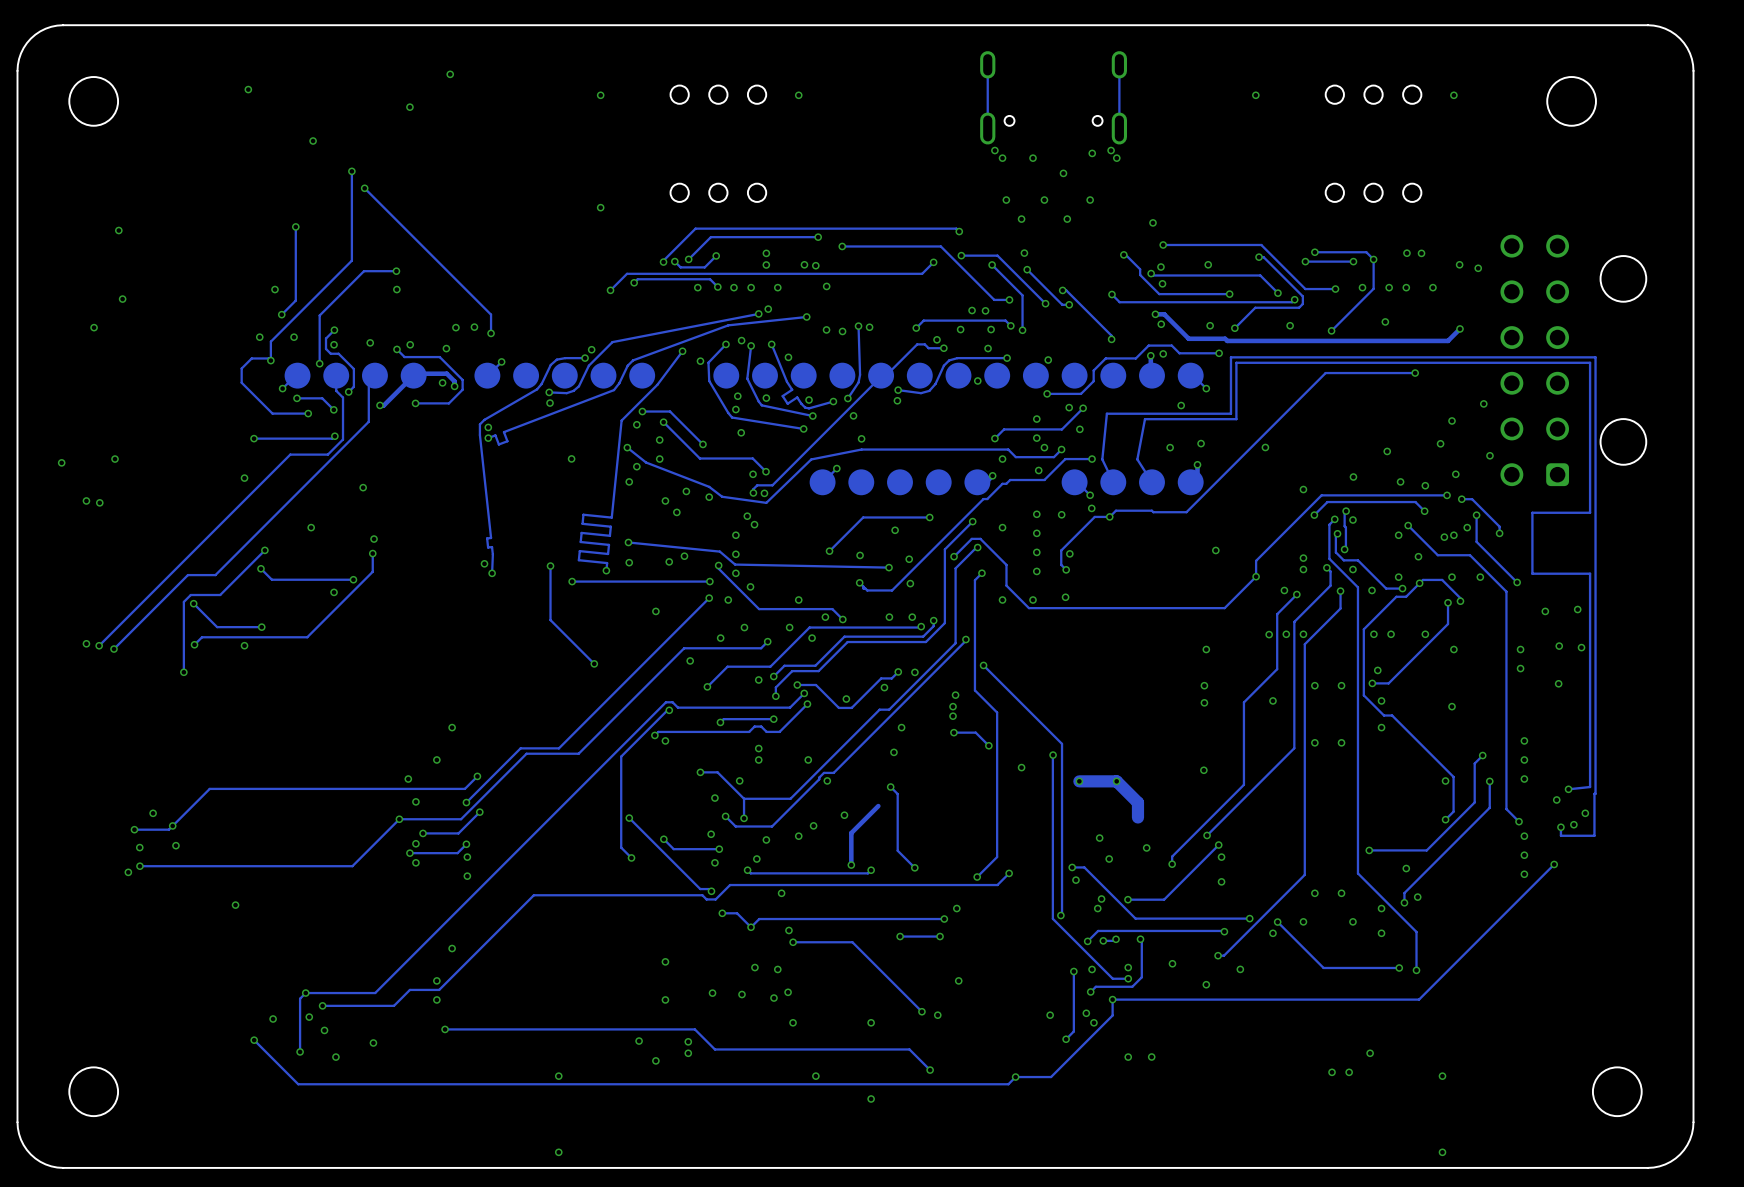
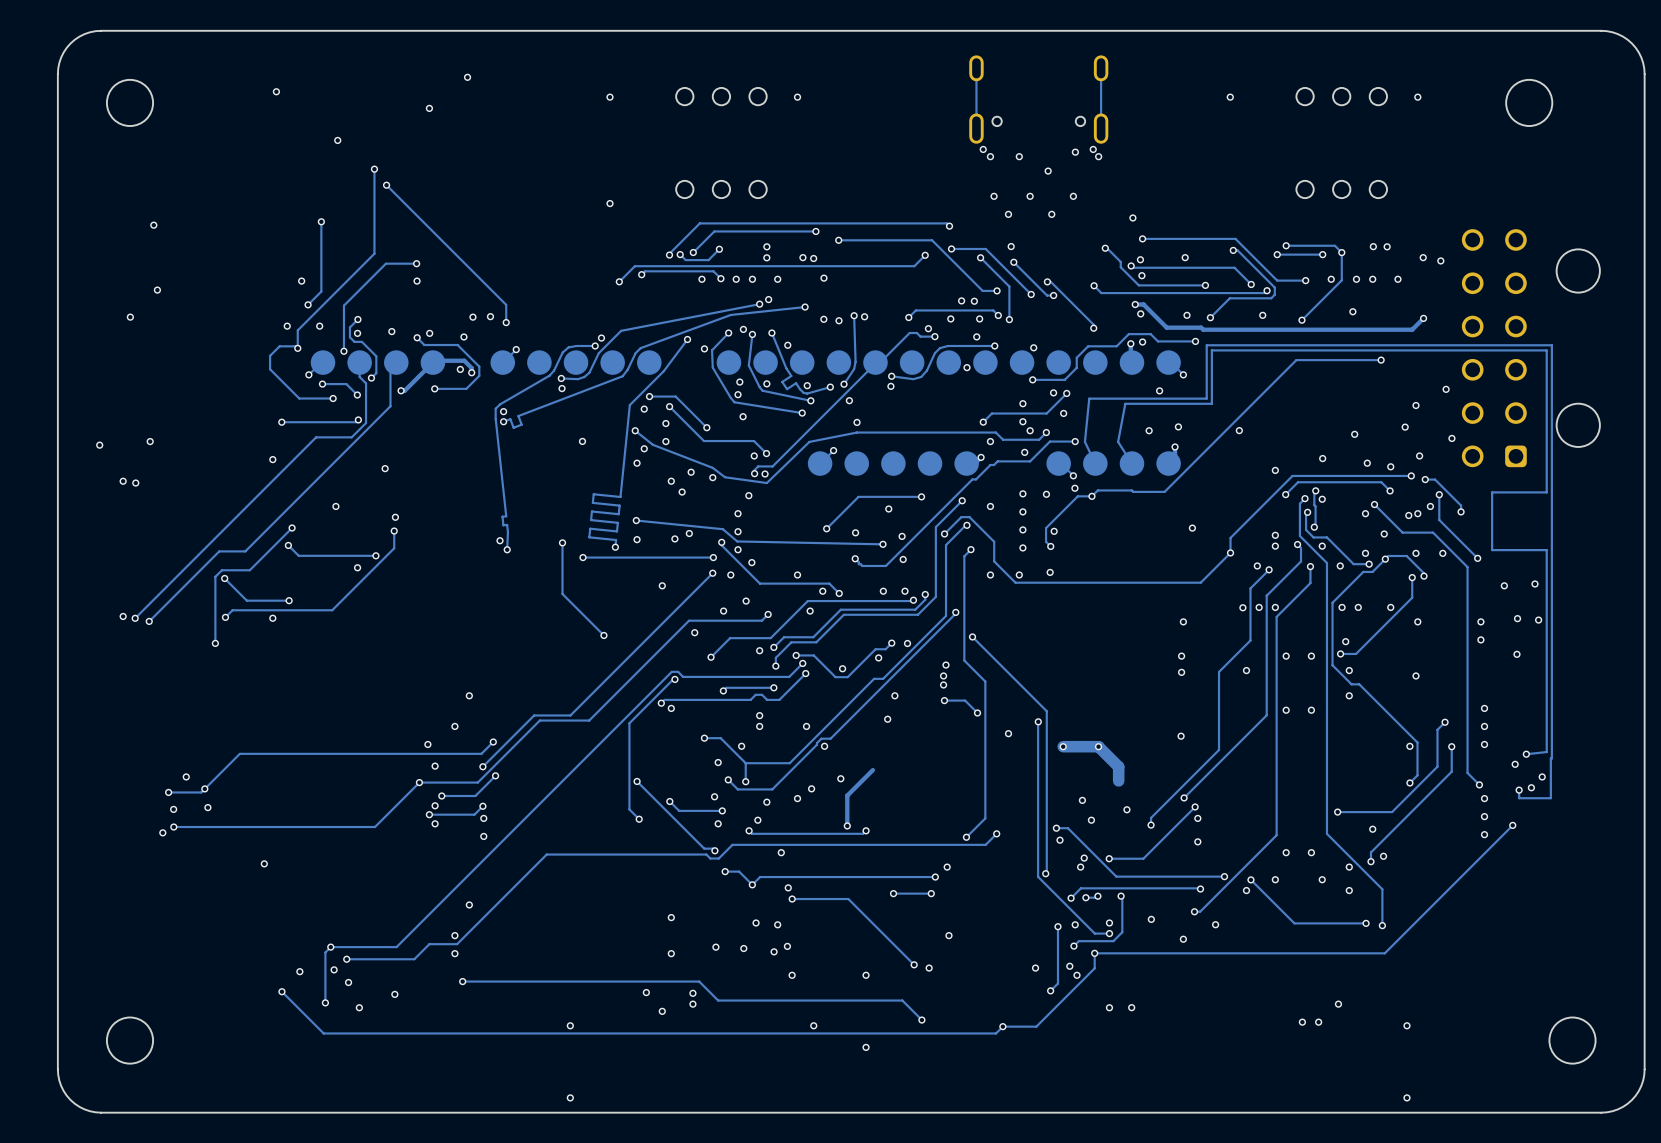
via: (754, 524) -> none
via: (789, 627) -> none
track: (890, 787) (897, 794) (897, 850) (914, 867) -> none
via: (890, 787) -> none
via: (914, 867) -> none

